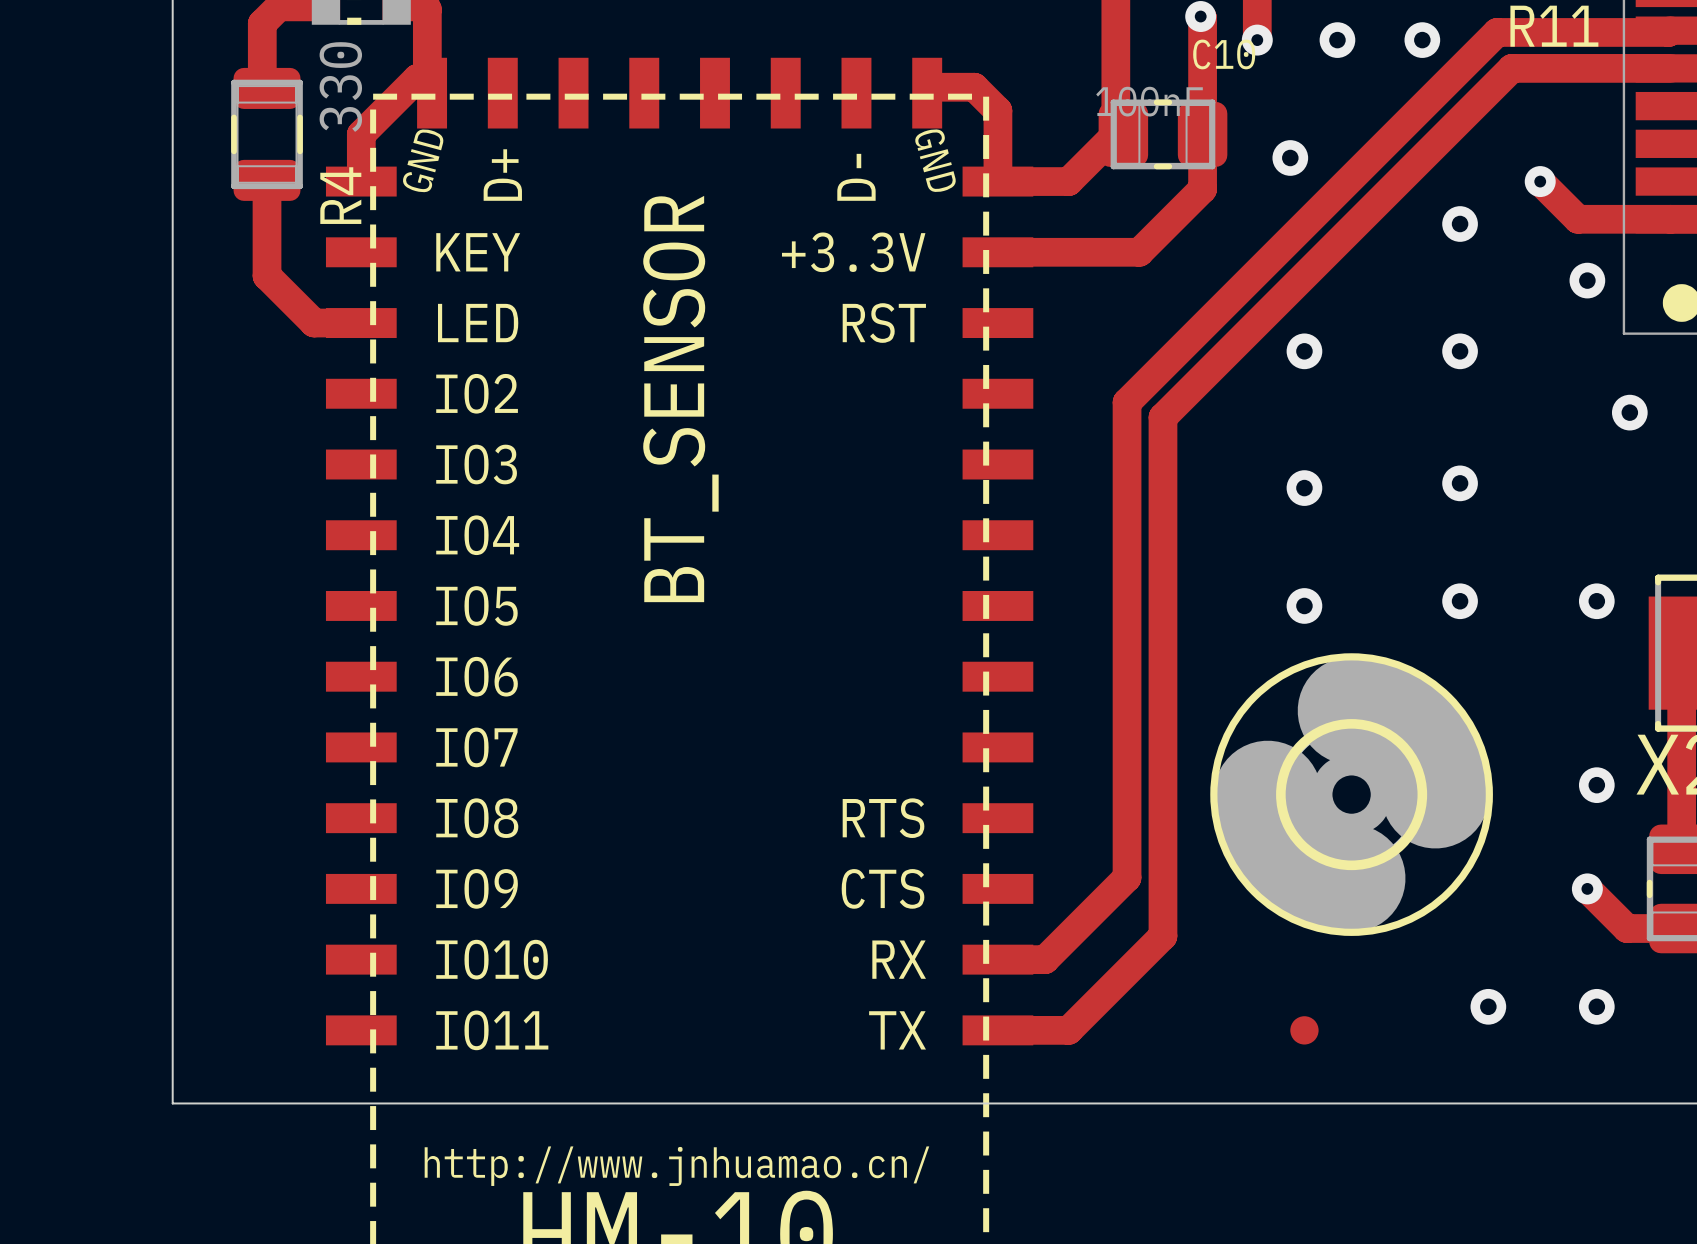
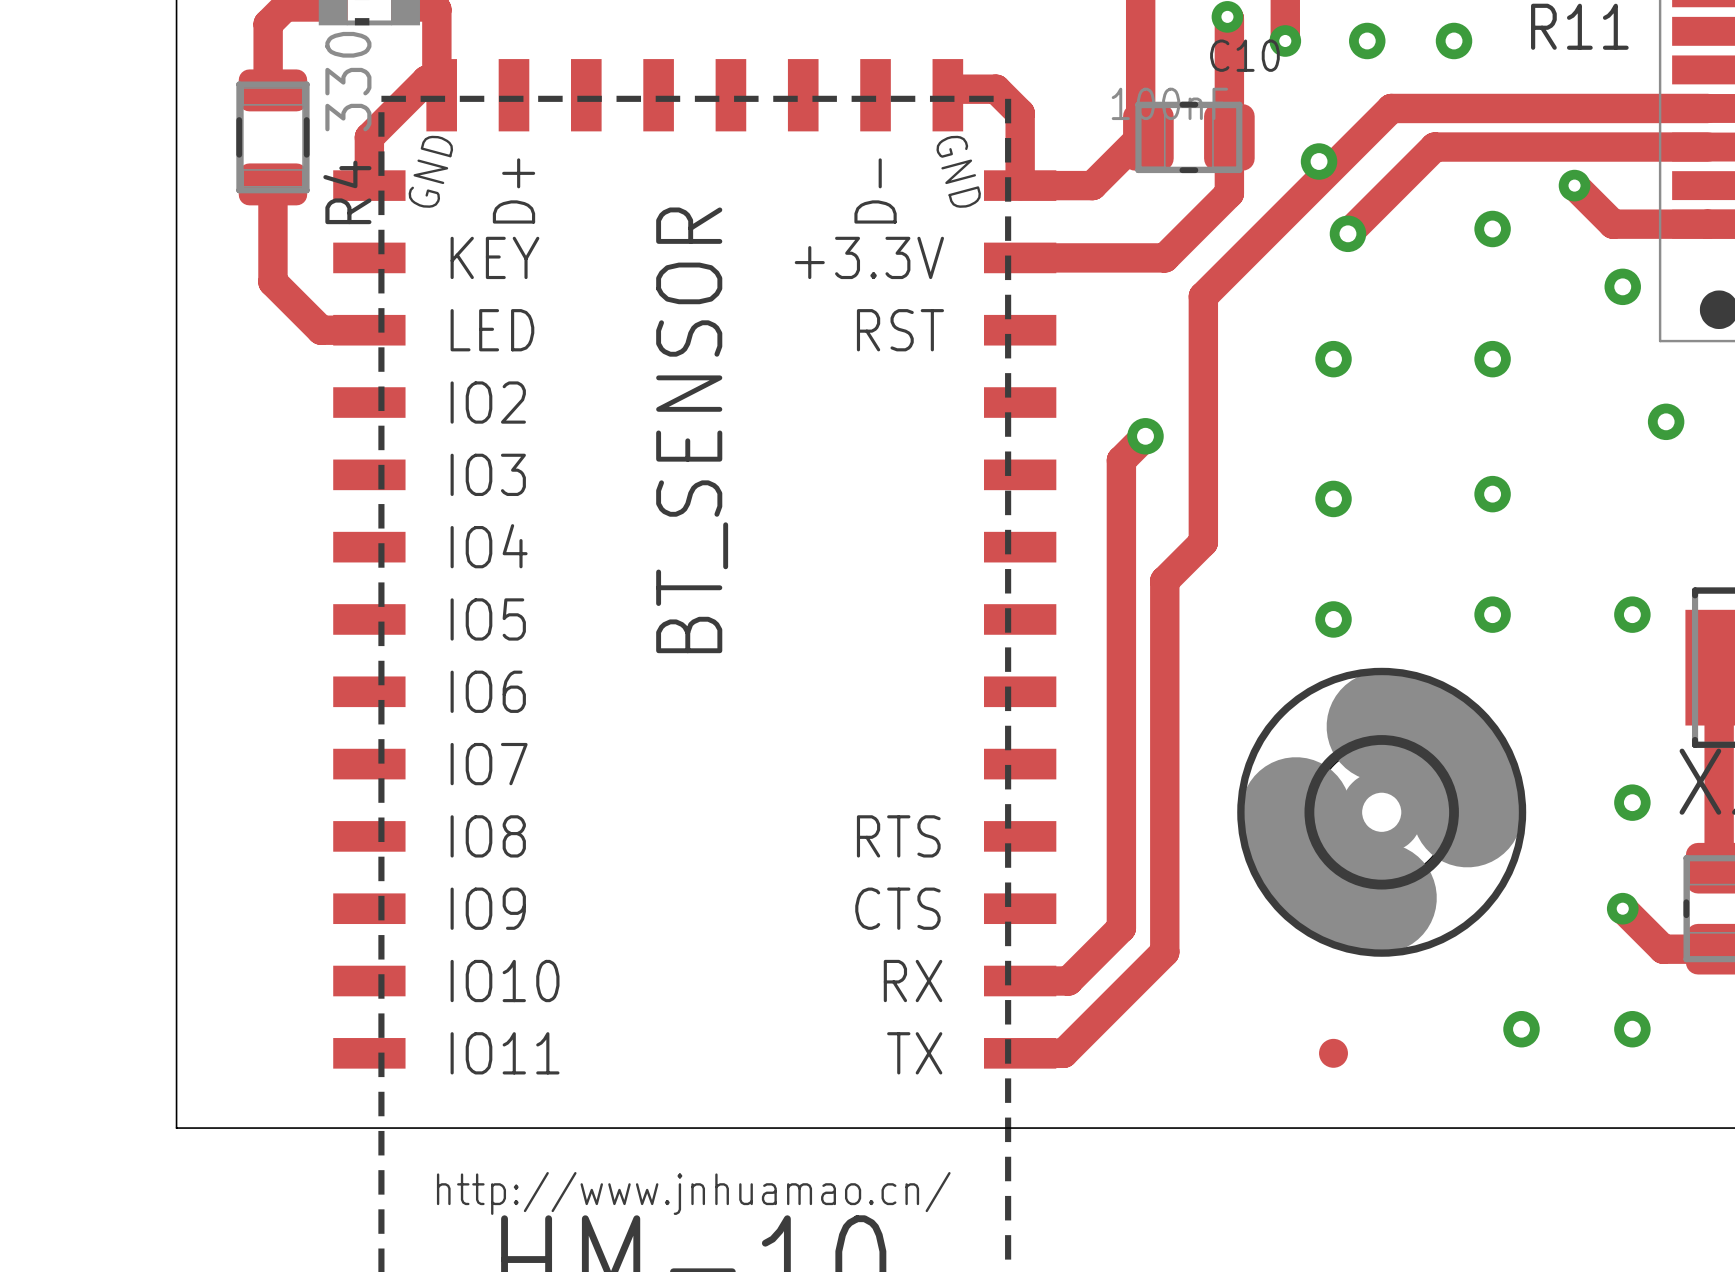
track: (1670, 30) (1668, 32) (1497, 32) (1127, 402) (1127, 877) (1096, 907) -> (1145, 436) (1121, 460) (1121, 927)
track: (1670, 68) (1511, 68) (1162, 417) (1162, 936) (1068, 1030) (1040, 1030) -> (1707, 108) (1391, 108) (1203, 296) (1203, 542) (1164, 580) (1164, 952) (1063, 1053)
track: none -> (1707, 147) (1434, 147) (1347, 233)
via: none -> (1347, 233)
via: none -> (1145, 436)

